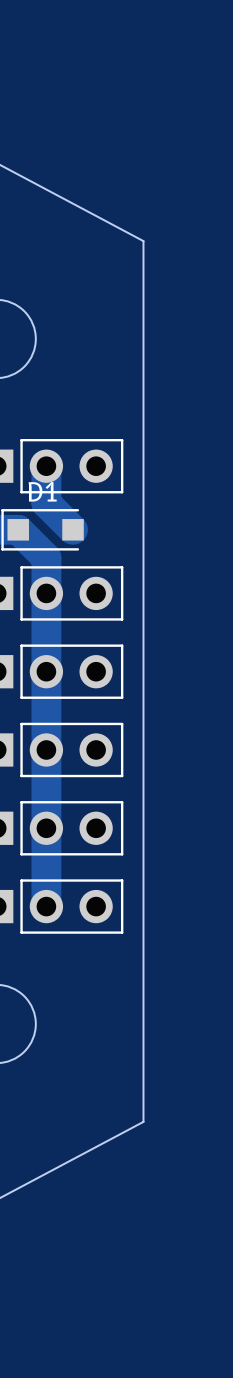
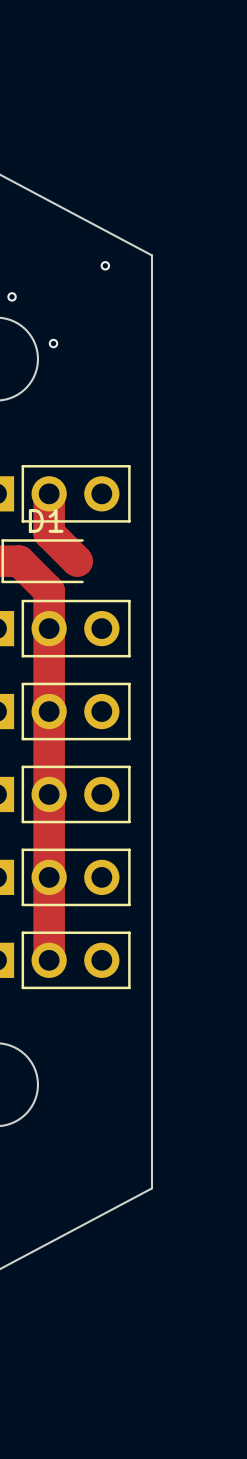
via: none -> (105, 265)
via: none -> (12, 296)
via: none -> (53, 343)

